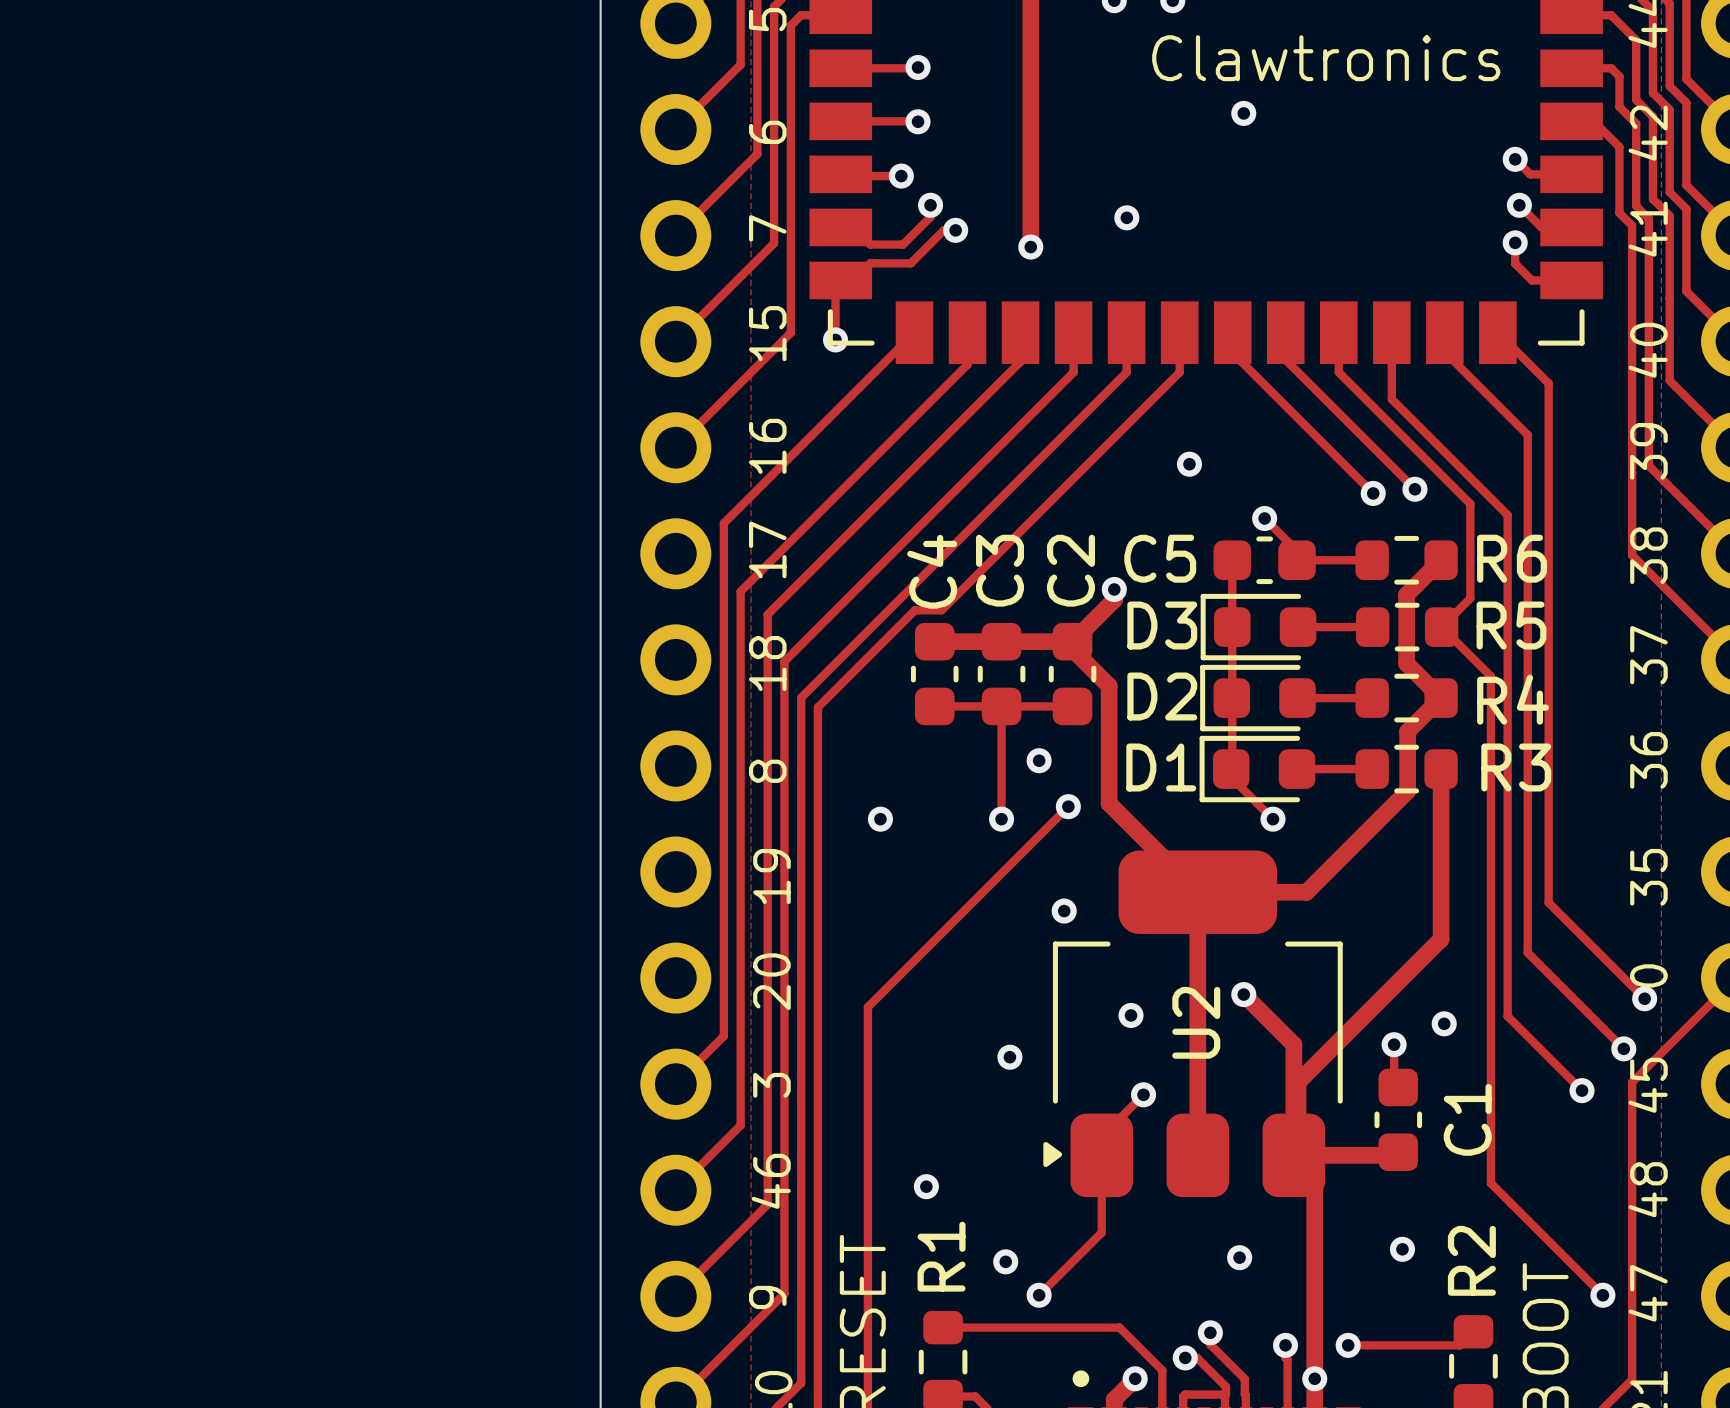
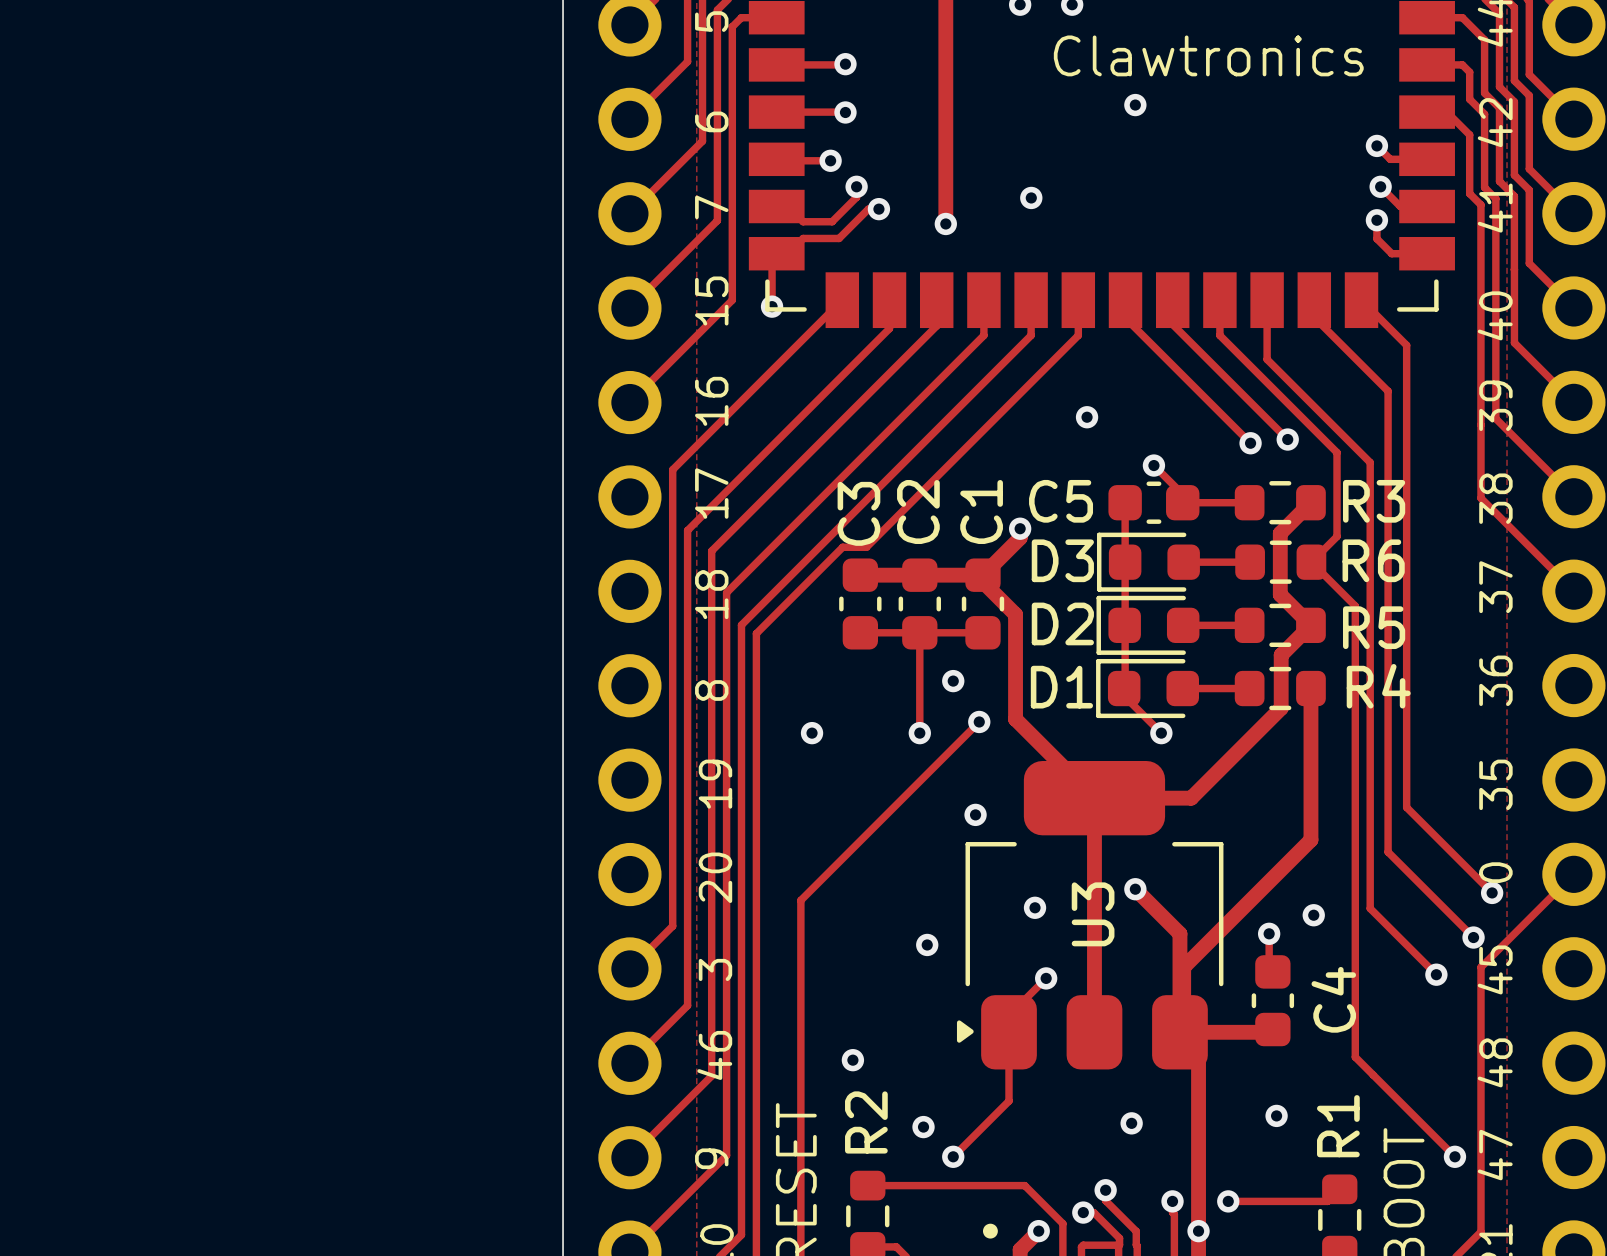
R6 name: R6 (1512, 558) -> R3 (1374, 501)
C3 name: C3 (999, 570) -> C2 (918, 512)
C2 name: C2 (1070, 570) -> C1 (981, 512)
C4 name: C4 (932, 571) -> C3 (858, 513)
R5 name: R5 (1511, 625) -> R6 (1373, 560)
R4 name: R4 (1513, 699) -> R5 (1374, 627)
R3 name: R3 (1516, 767) -> R4 (1378, 686)
U2 name: U2 (1196, 1022) -> U3 (1093, 914)
C1 name: C1 (1467, 1119) -> C4 (1333, 999)
R1 name: R1 (941, 1256) -> R2 (866, 1122)
R2 name: R2 (1471, 1260) -> R1 (1338, 1126)

